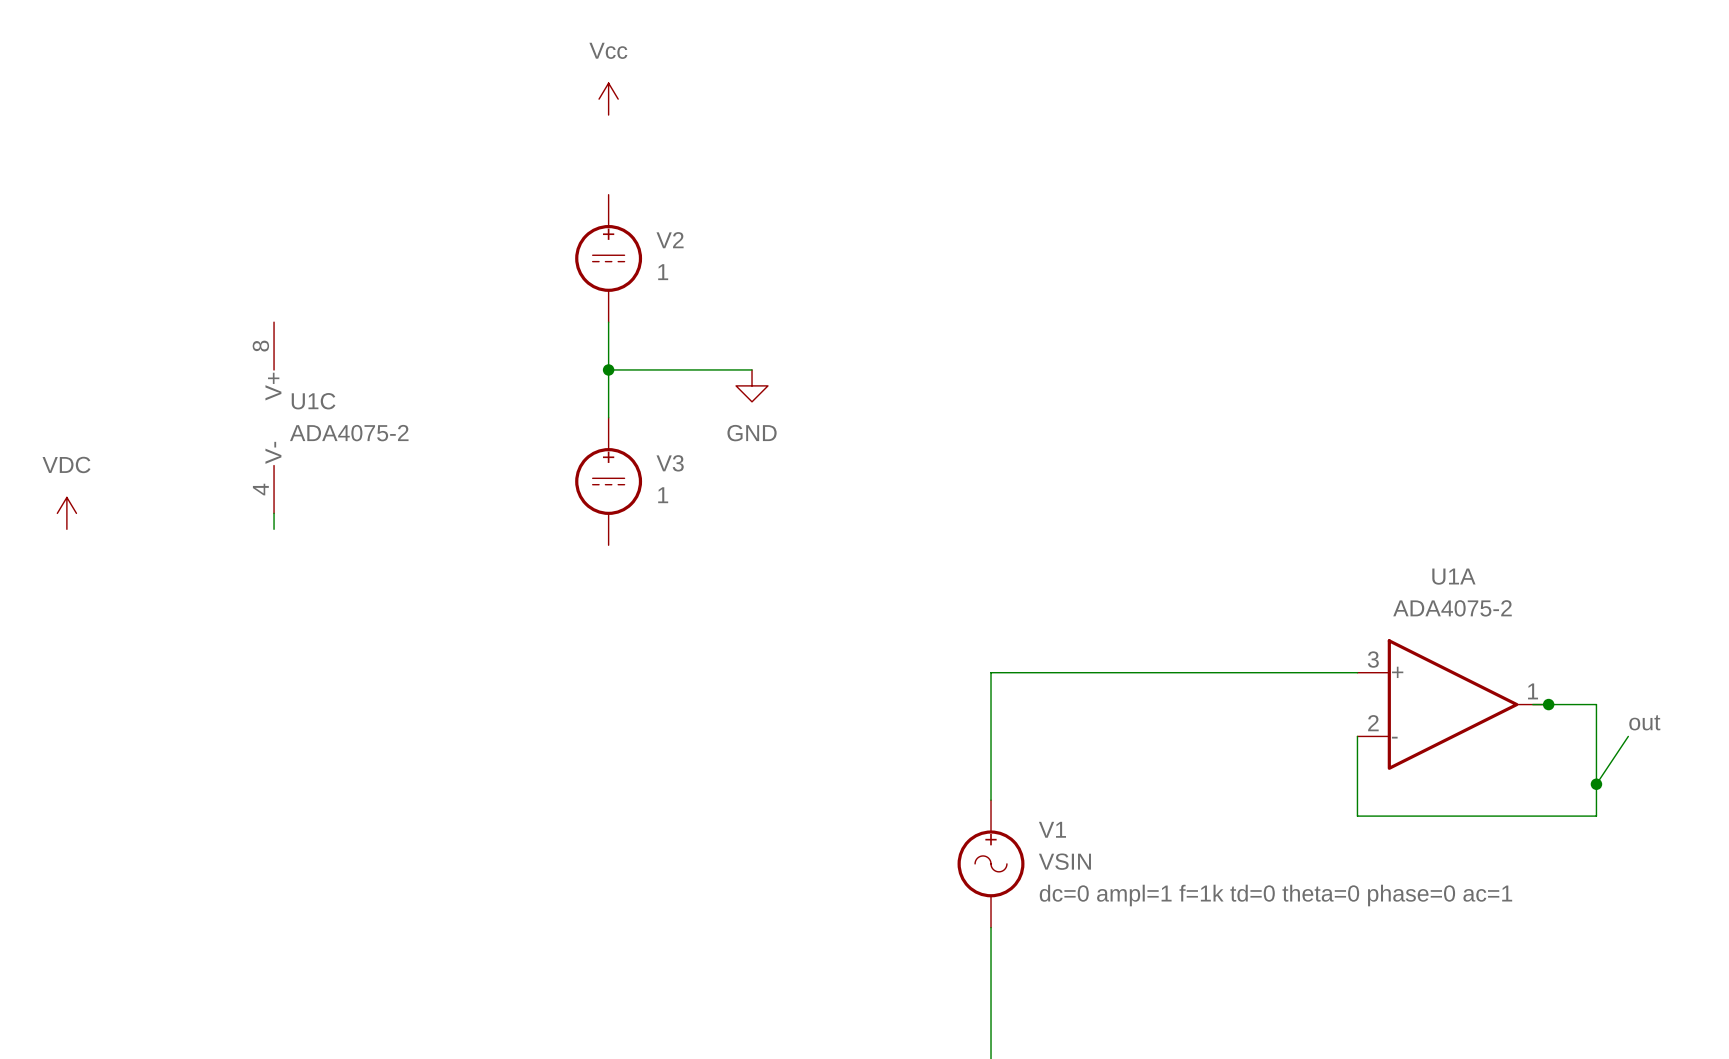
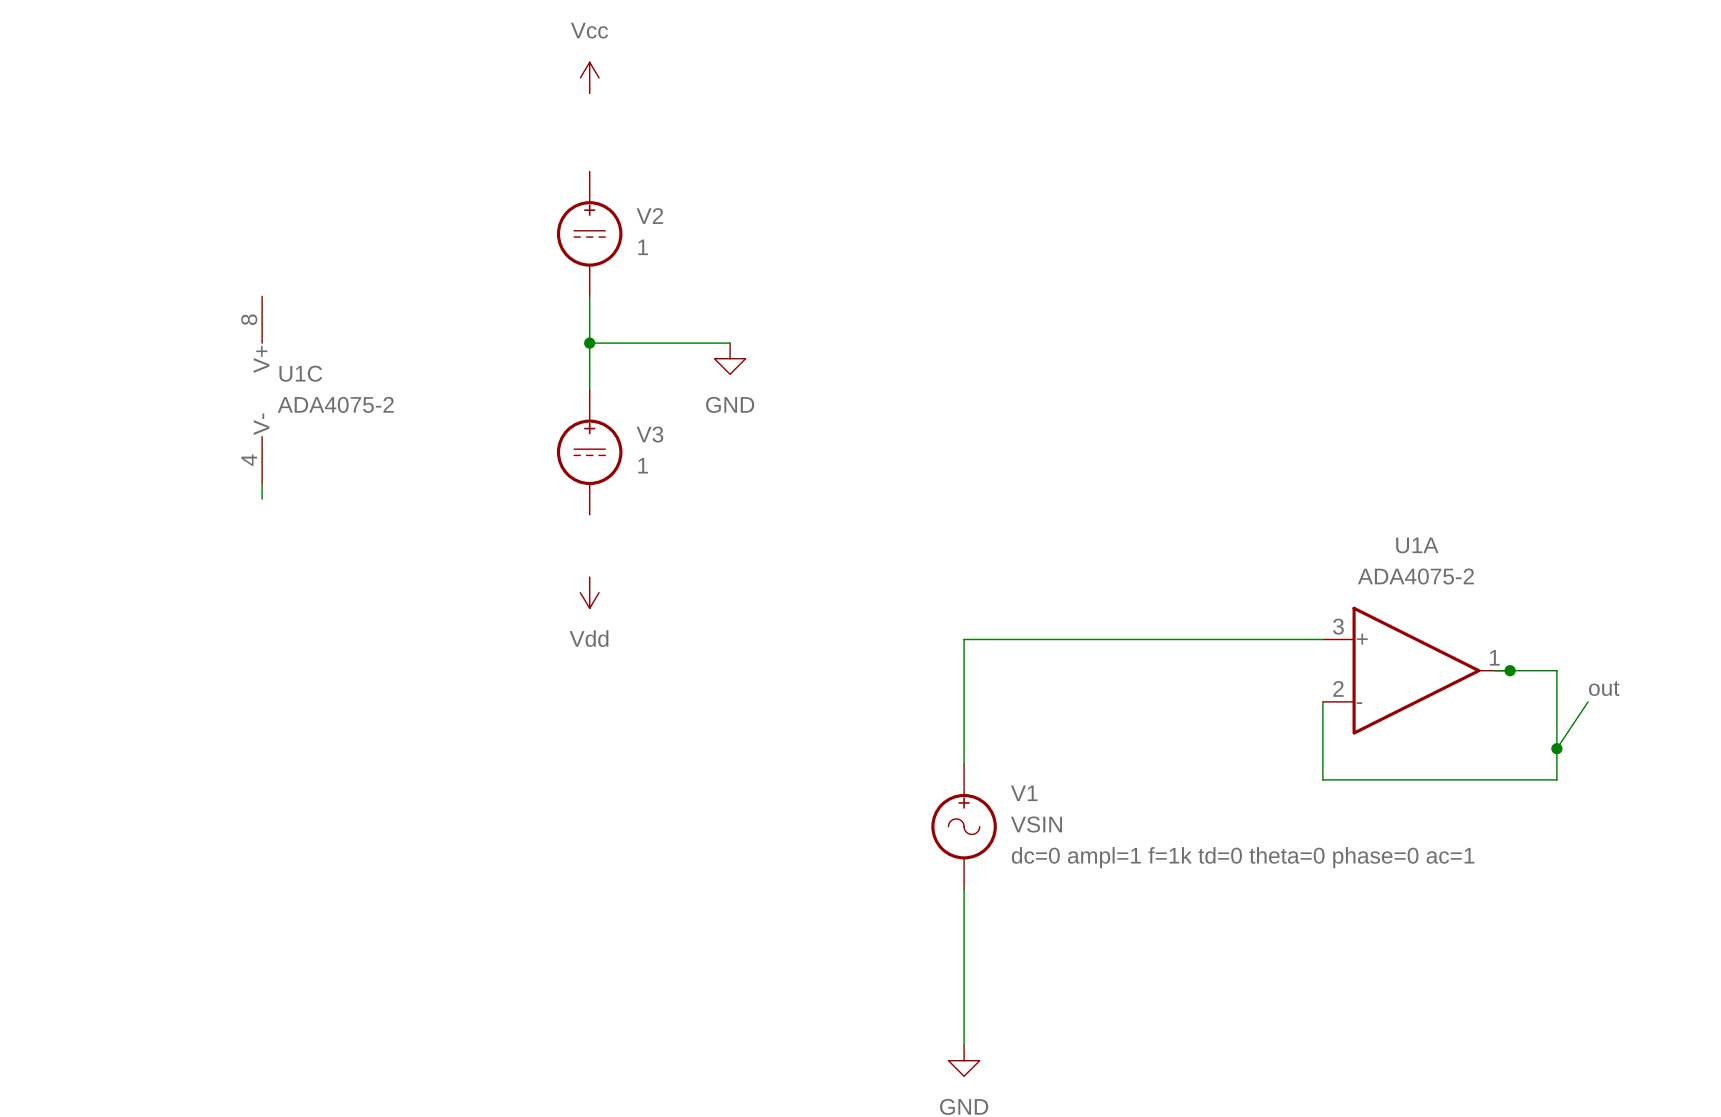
power symbol: VDC (66, 513) -> none
power symbol: none -> Vdd (589, 592)

